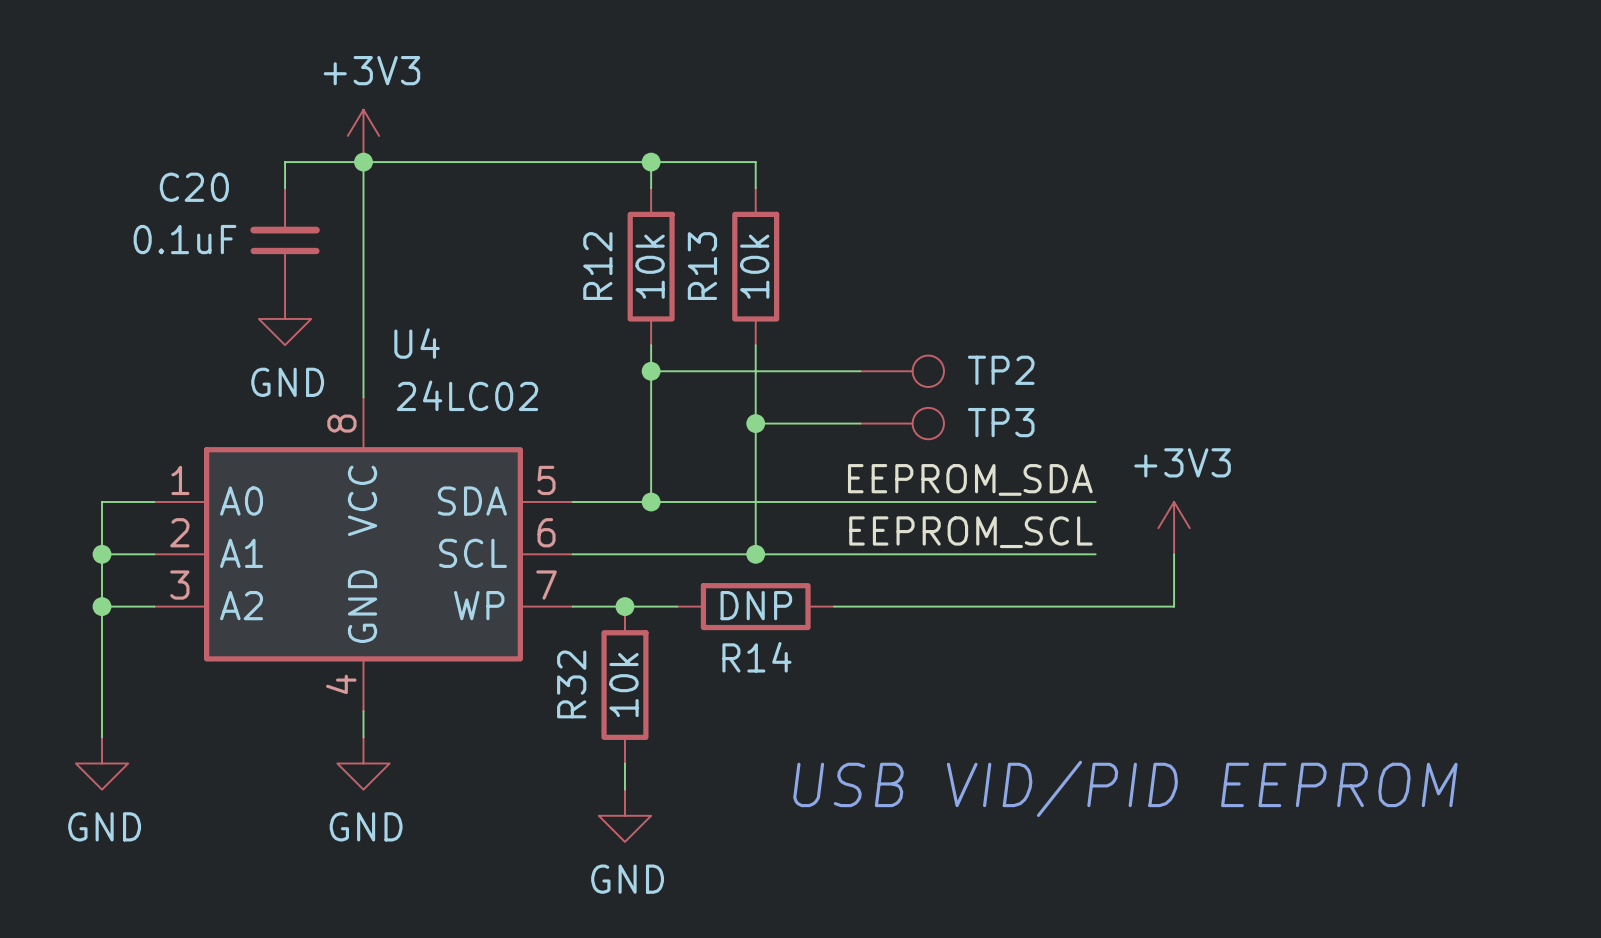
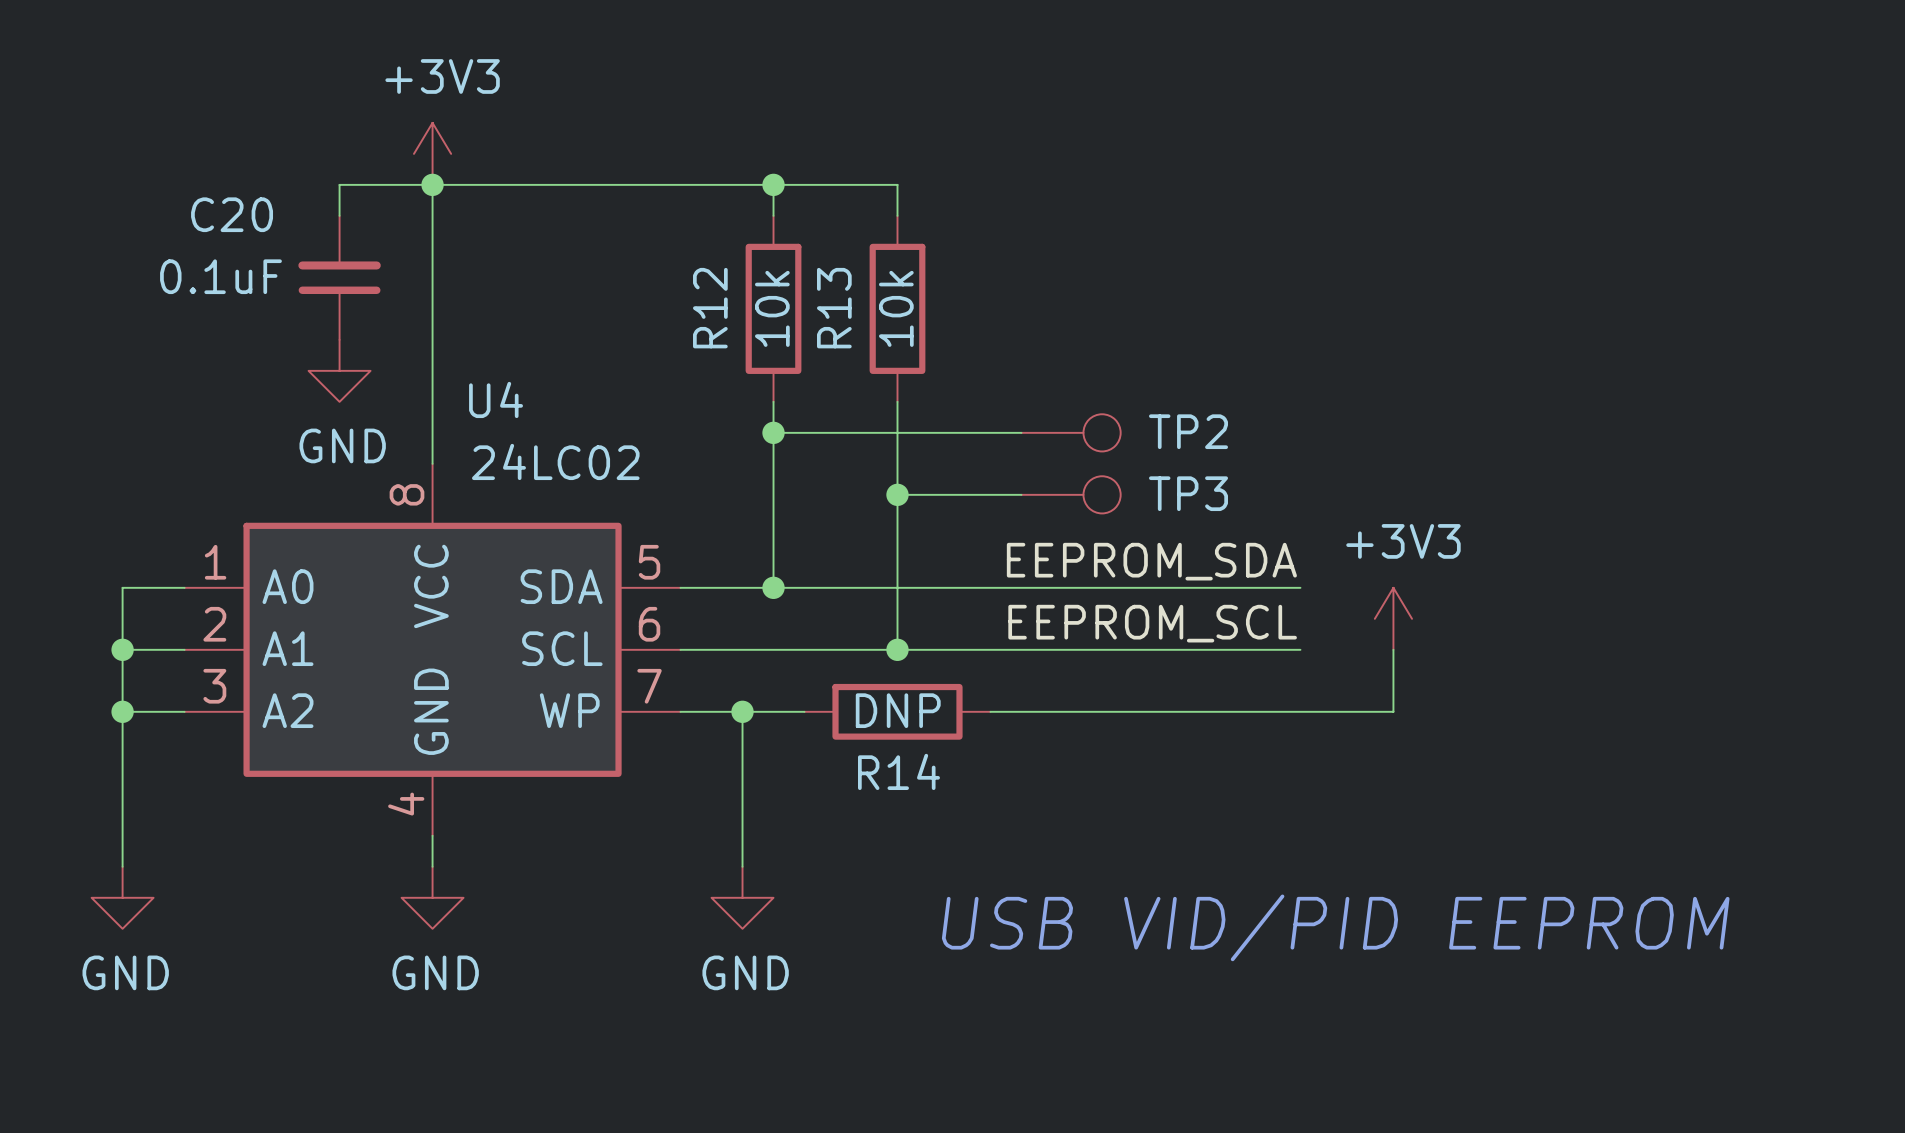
wire: none -> (742, 711) (742, 866)
R32: 10k (624, 685) -> none
wire: (624, 763) (624, 789) -> none
power symbol position: GND (624, 815) -> GND (742, 897)

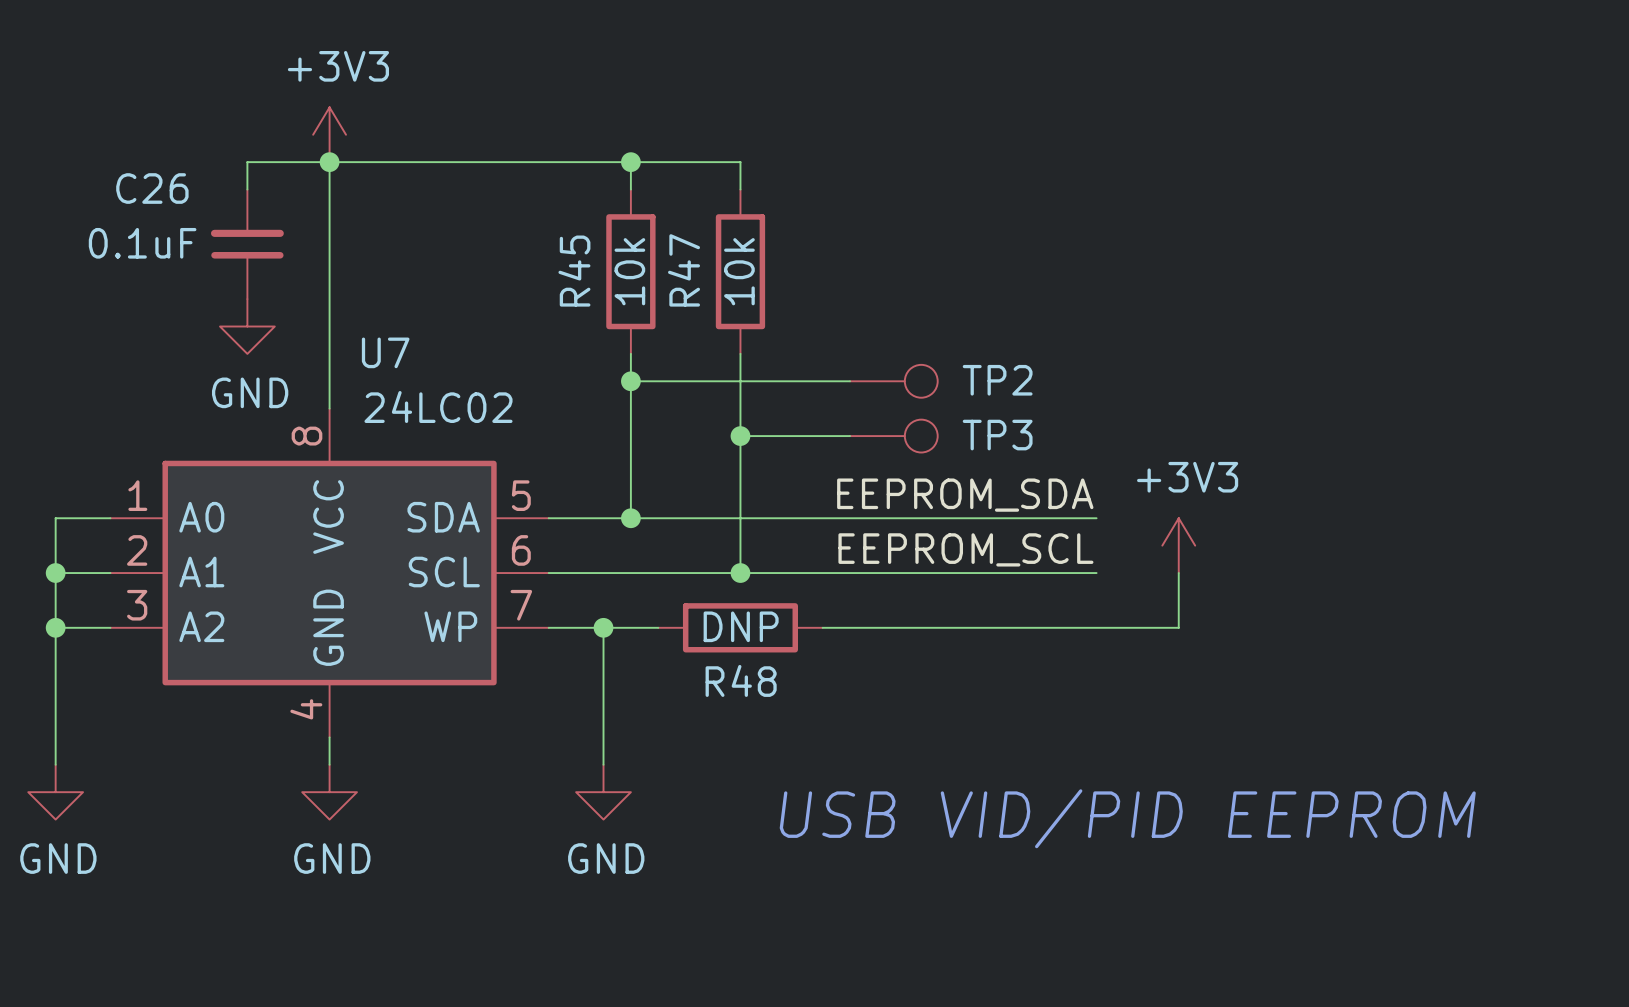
C20 name: C20 (232, 214) -> C26 (152, 188)
R12 name: R12 (710, 308) -> R45 (574, 271)
R13 name: R13 (834, 308) -> R47 (684, 270)
U4 name: U4 (496, 399) -> U7 (385, 352)
R14 name: R14 (898, 771) -> R48 (741, 680)

